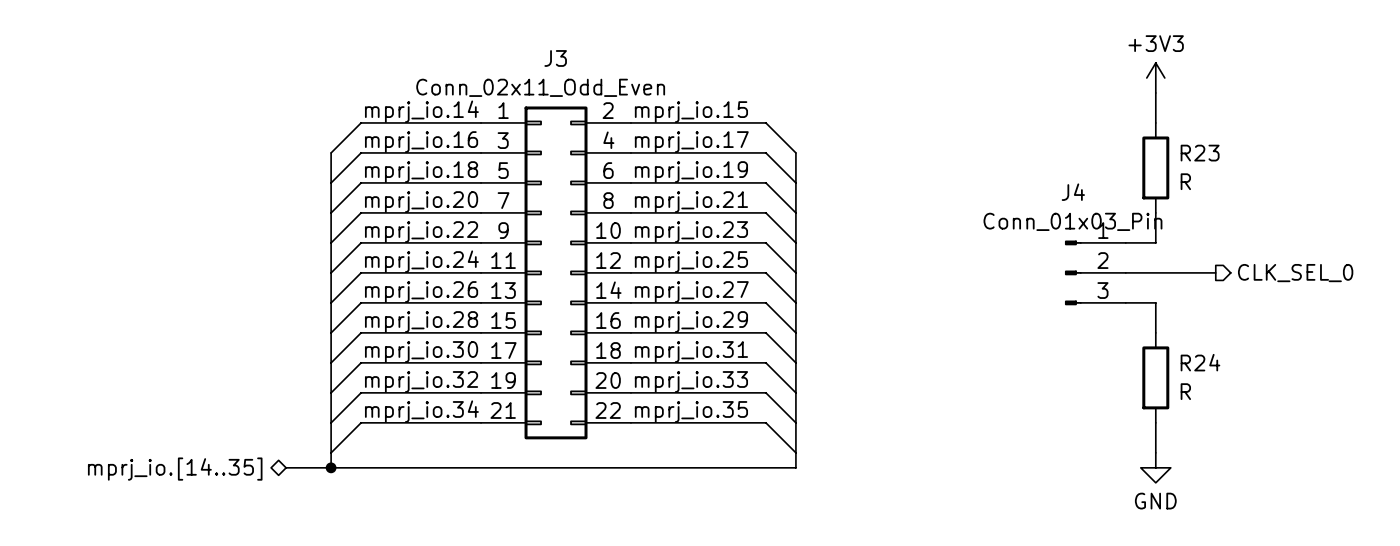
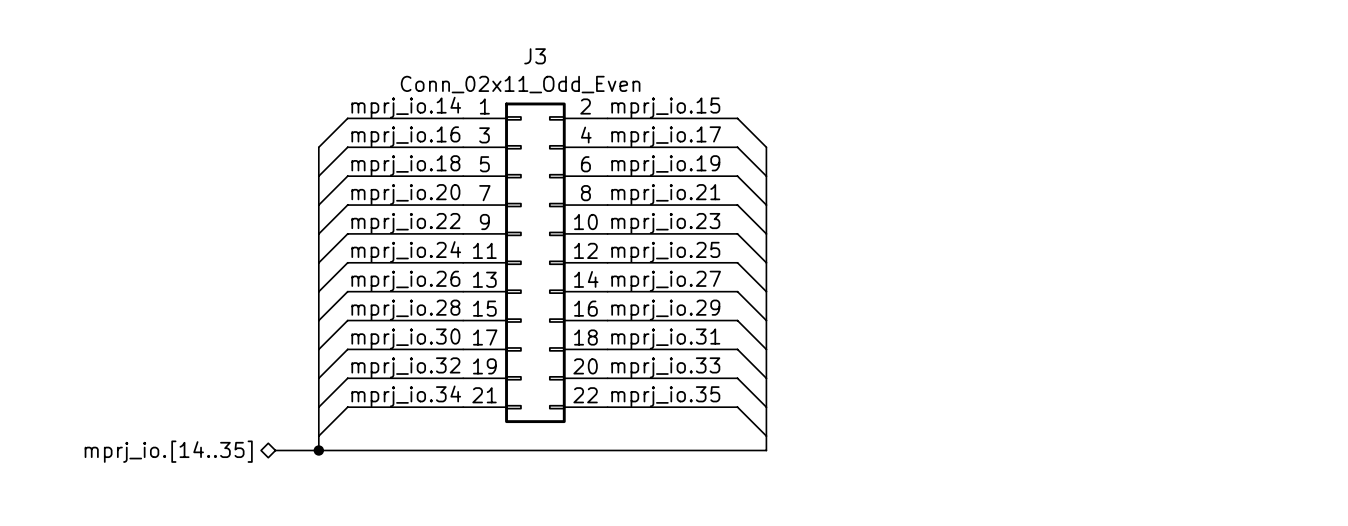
power symbol: +3V3 (1155, 77) -> none
wire: (1155, 92) (1155, 122) -> none
R23: R (1155, 167) -> none
wire: (1155, 212) (1155, 242) (1125, 242) -> none
J4: Conn_01x03_Pin (1095, 272) -> none
wire: (1125, 272) (1215, 272) -> none
hierarchical label: CLK_SEL_0 (1295, 273) -> none
wire: (1125, 302) (1155, 302) (1155, 332) -> none
R24: R (1155, 377) -> none
wire: (1155, 422) (1155, 452) -> none
power symbol: GND (1155, 467) -> none

